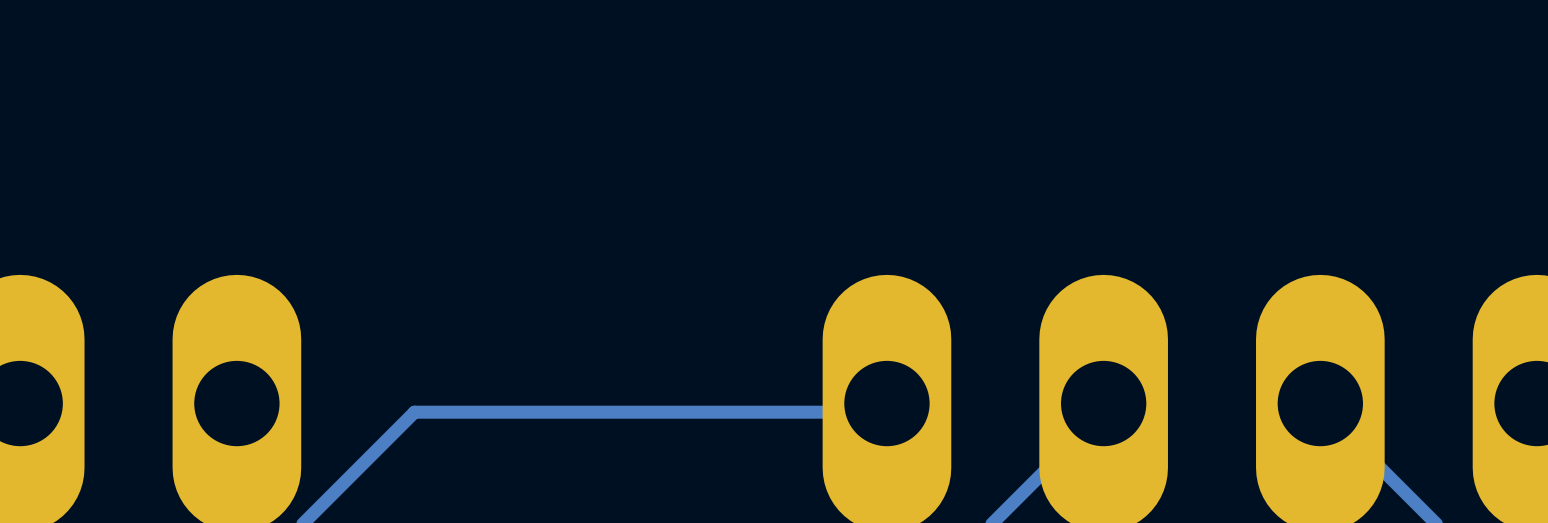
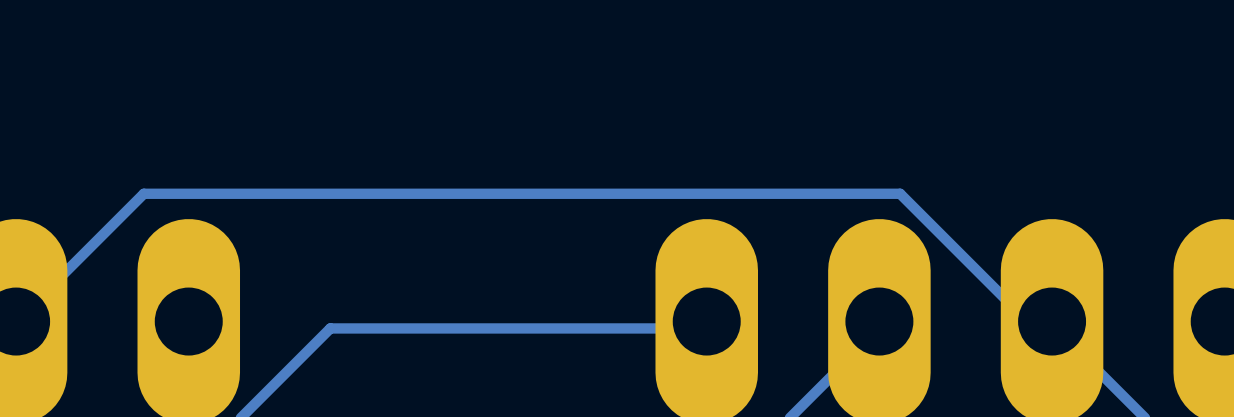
track: none -> (1052, 321) (1045, 318) (1024, 318) (900, 193) (143, 193) (16, 321)

